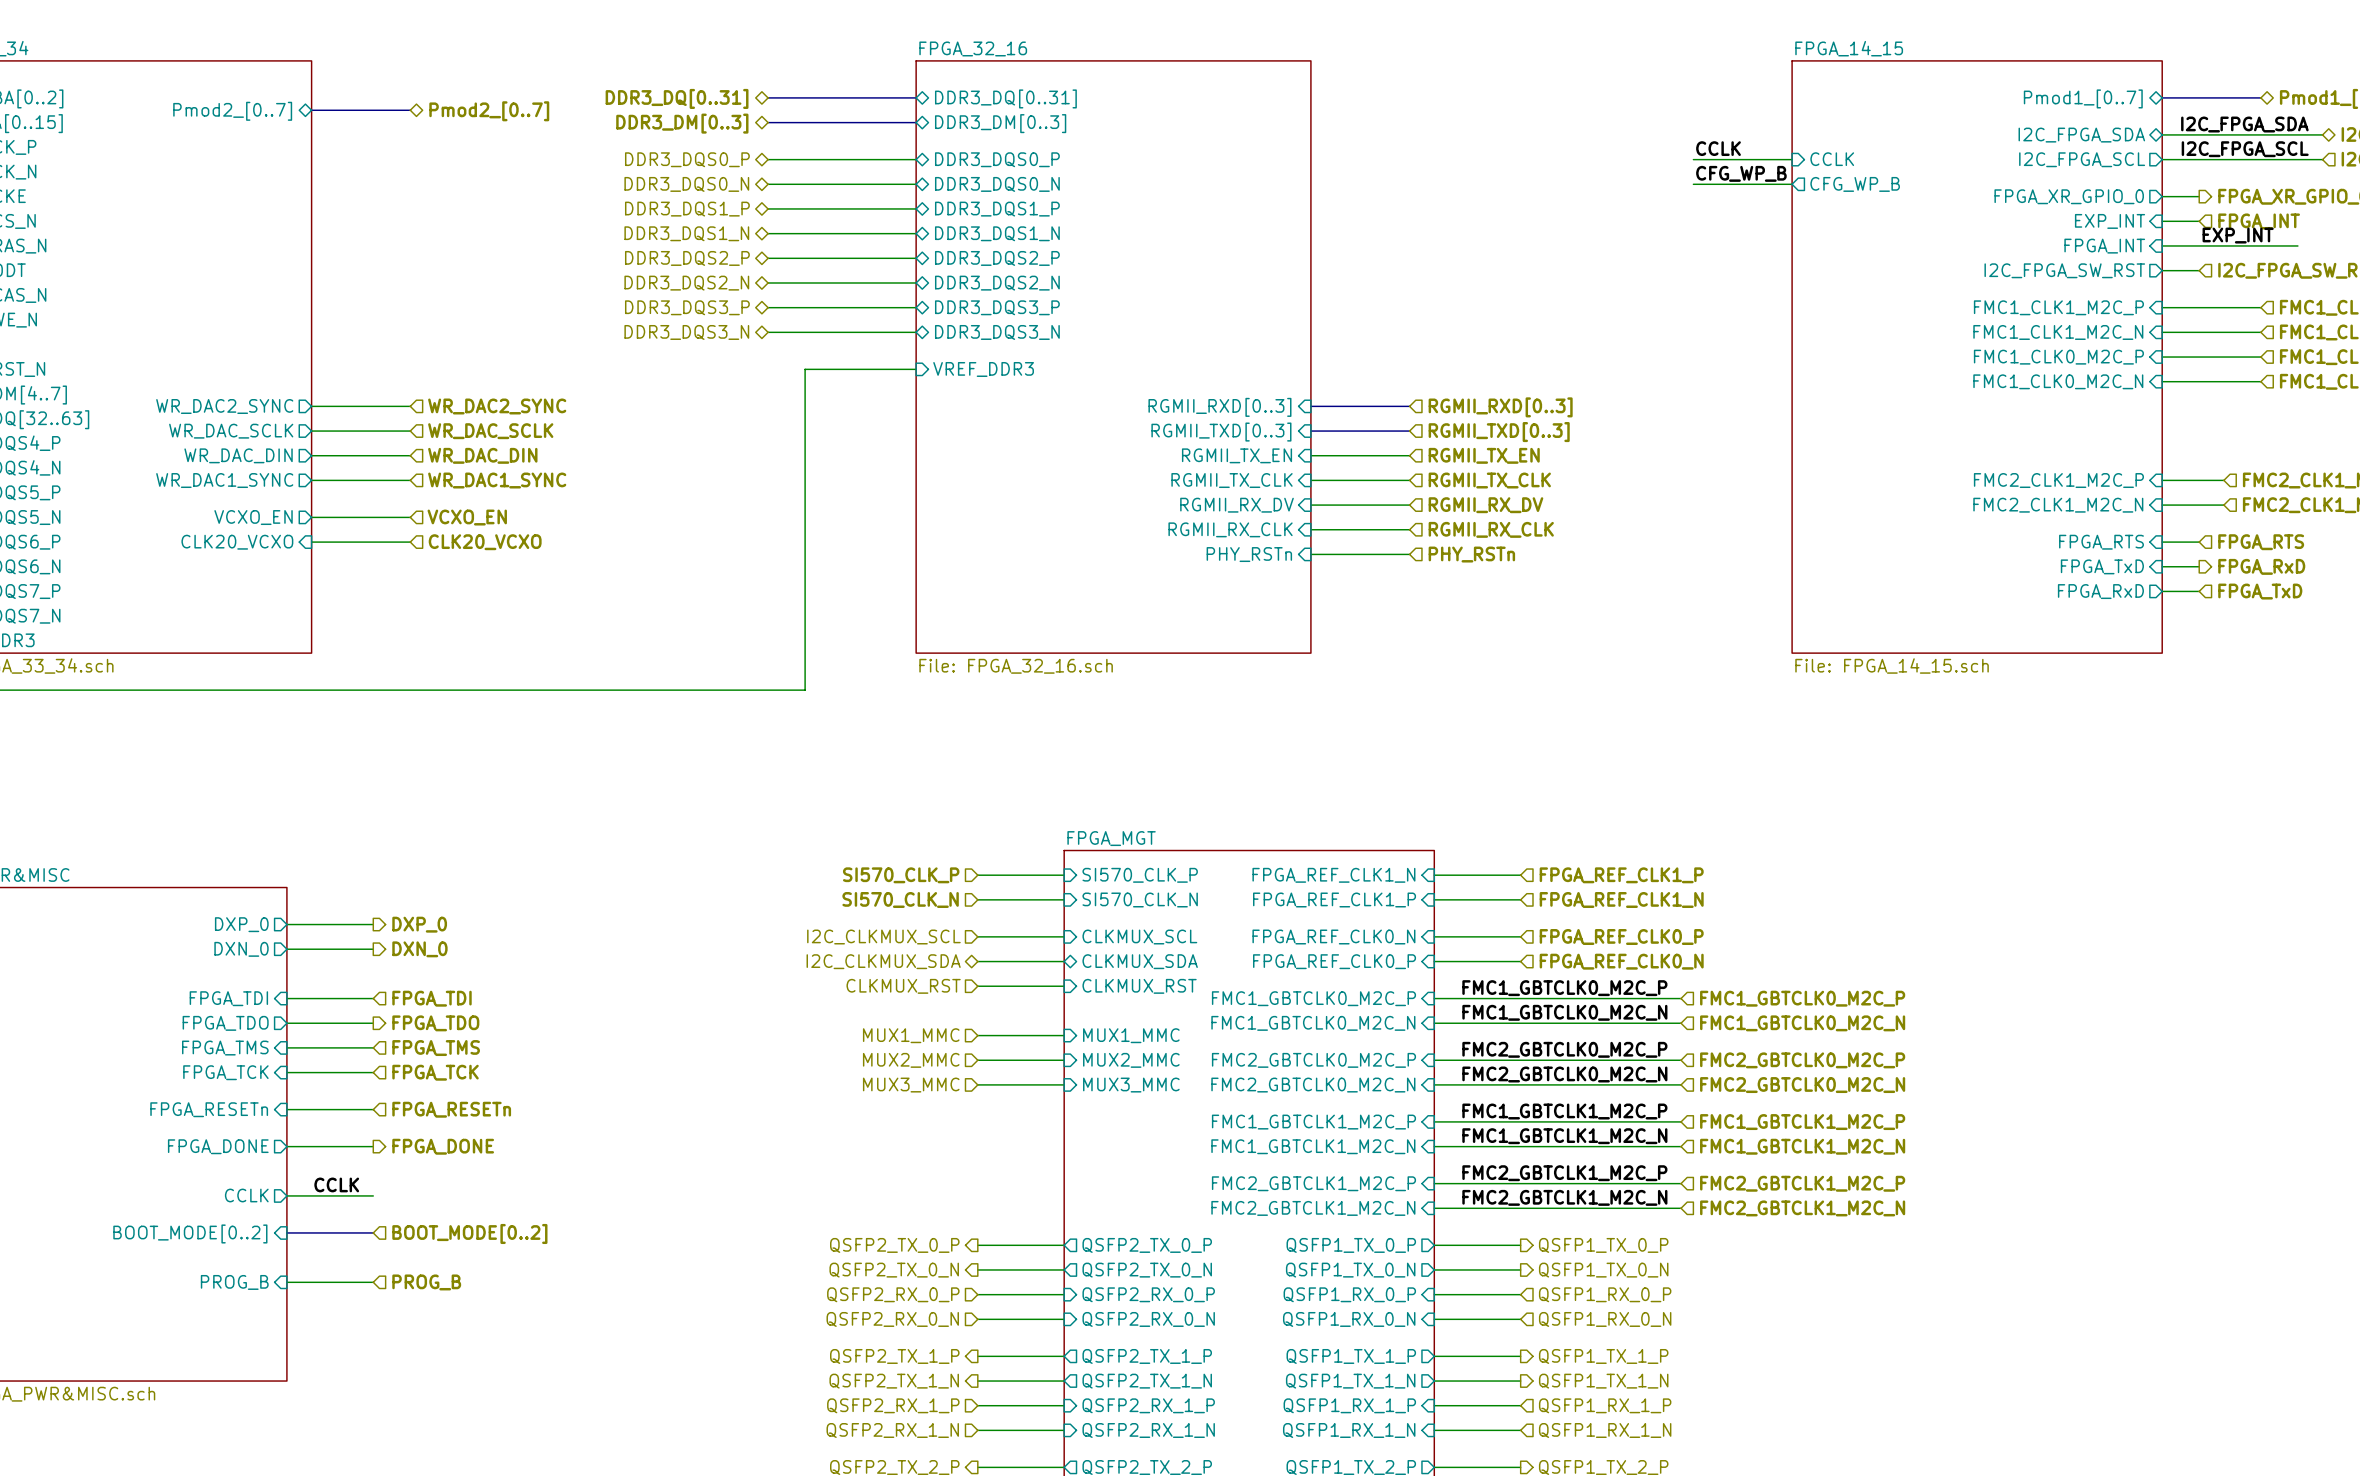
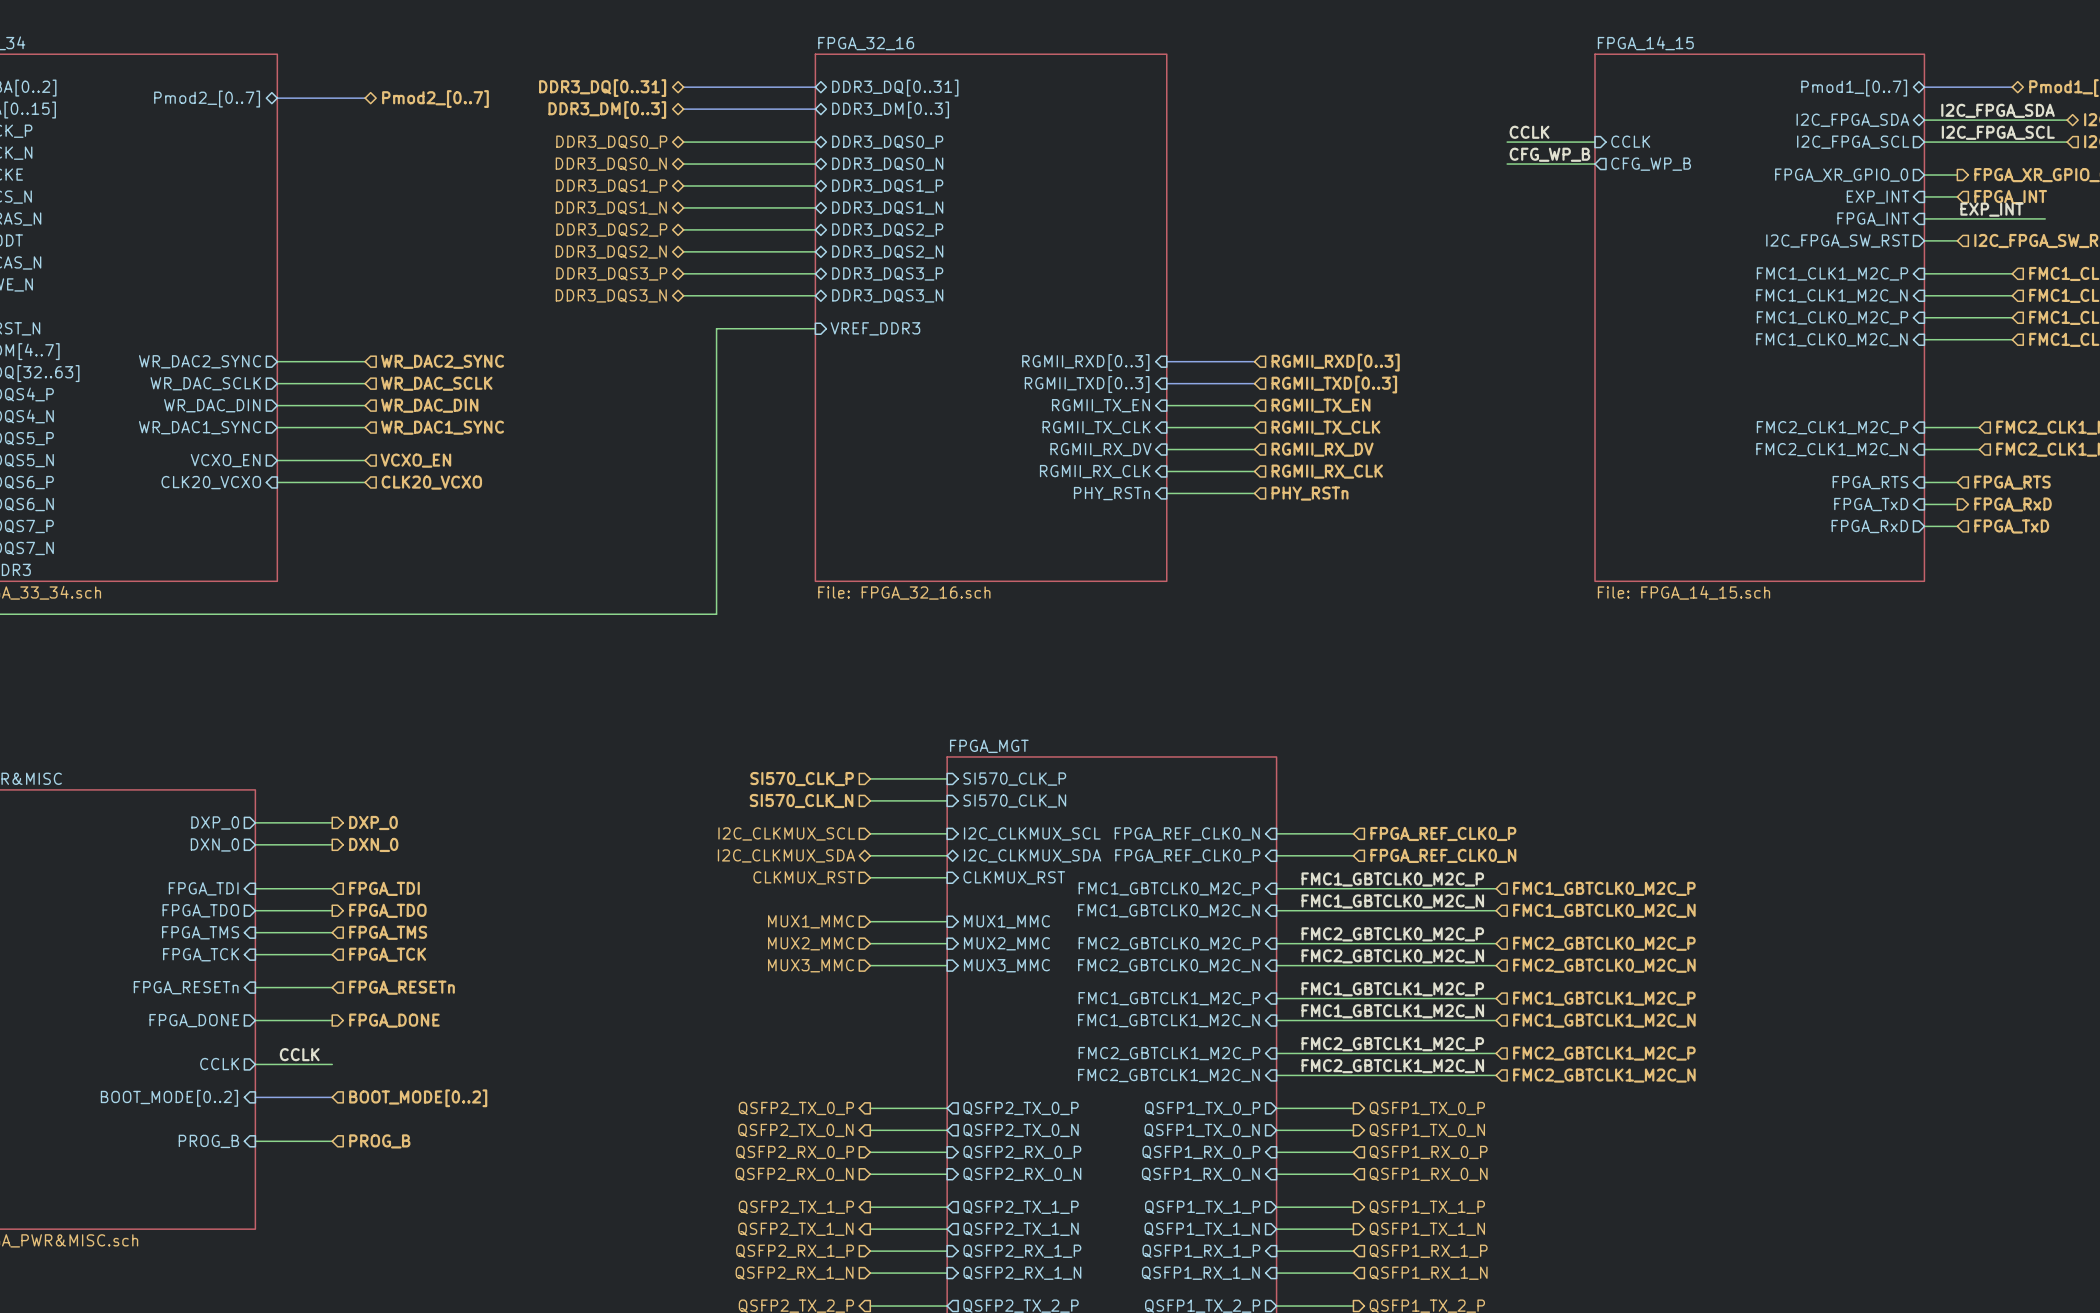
sheet pin: FPGA_REF_CLK1_N (1333, 875) -> none
wire: (1434, 875) (1520, 875) -> none
hierarchical label: FPGA_REF_CLK1_P (1621, 875) -> none
sheet pin: FPGA_REF_CLK1_P (1334, 899) -> none
wire: (1434, 899) (1520, 899) -> none
hierarchical label: FPGA_REF_CLK1_N (1621, 899) -> none
sheet pin: CLKMUX_SCL (1139, 937) -> I2C_CLKMUX_SCL (1032, 833)
sheet pin: CLKMUX_SDA (1140, 961) -> I2C_CLKMUX_SDA (1032, 855)

